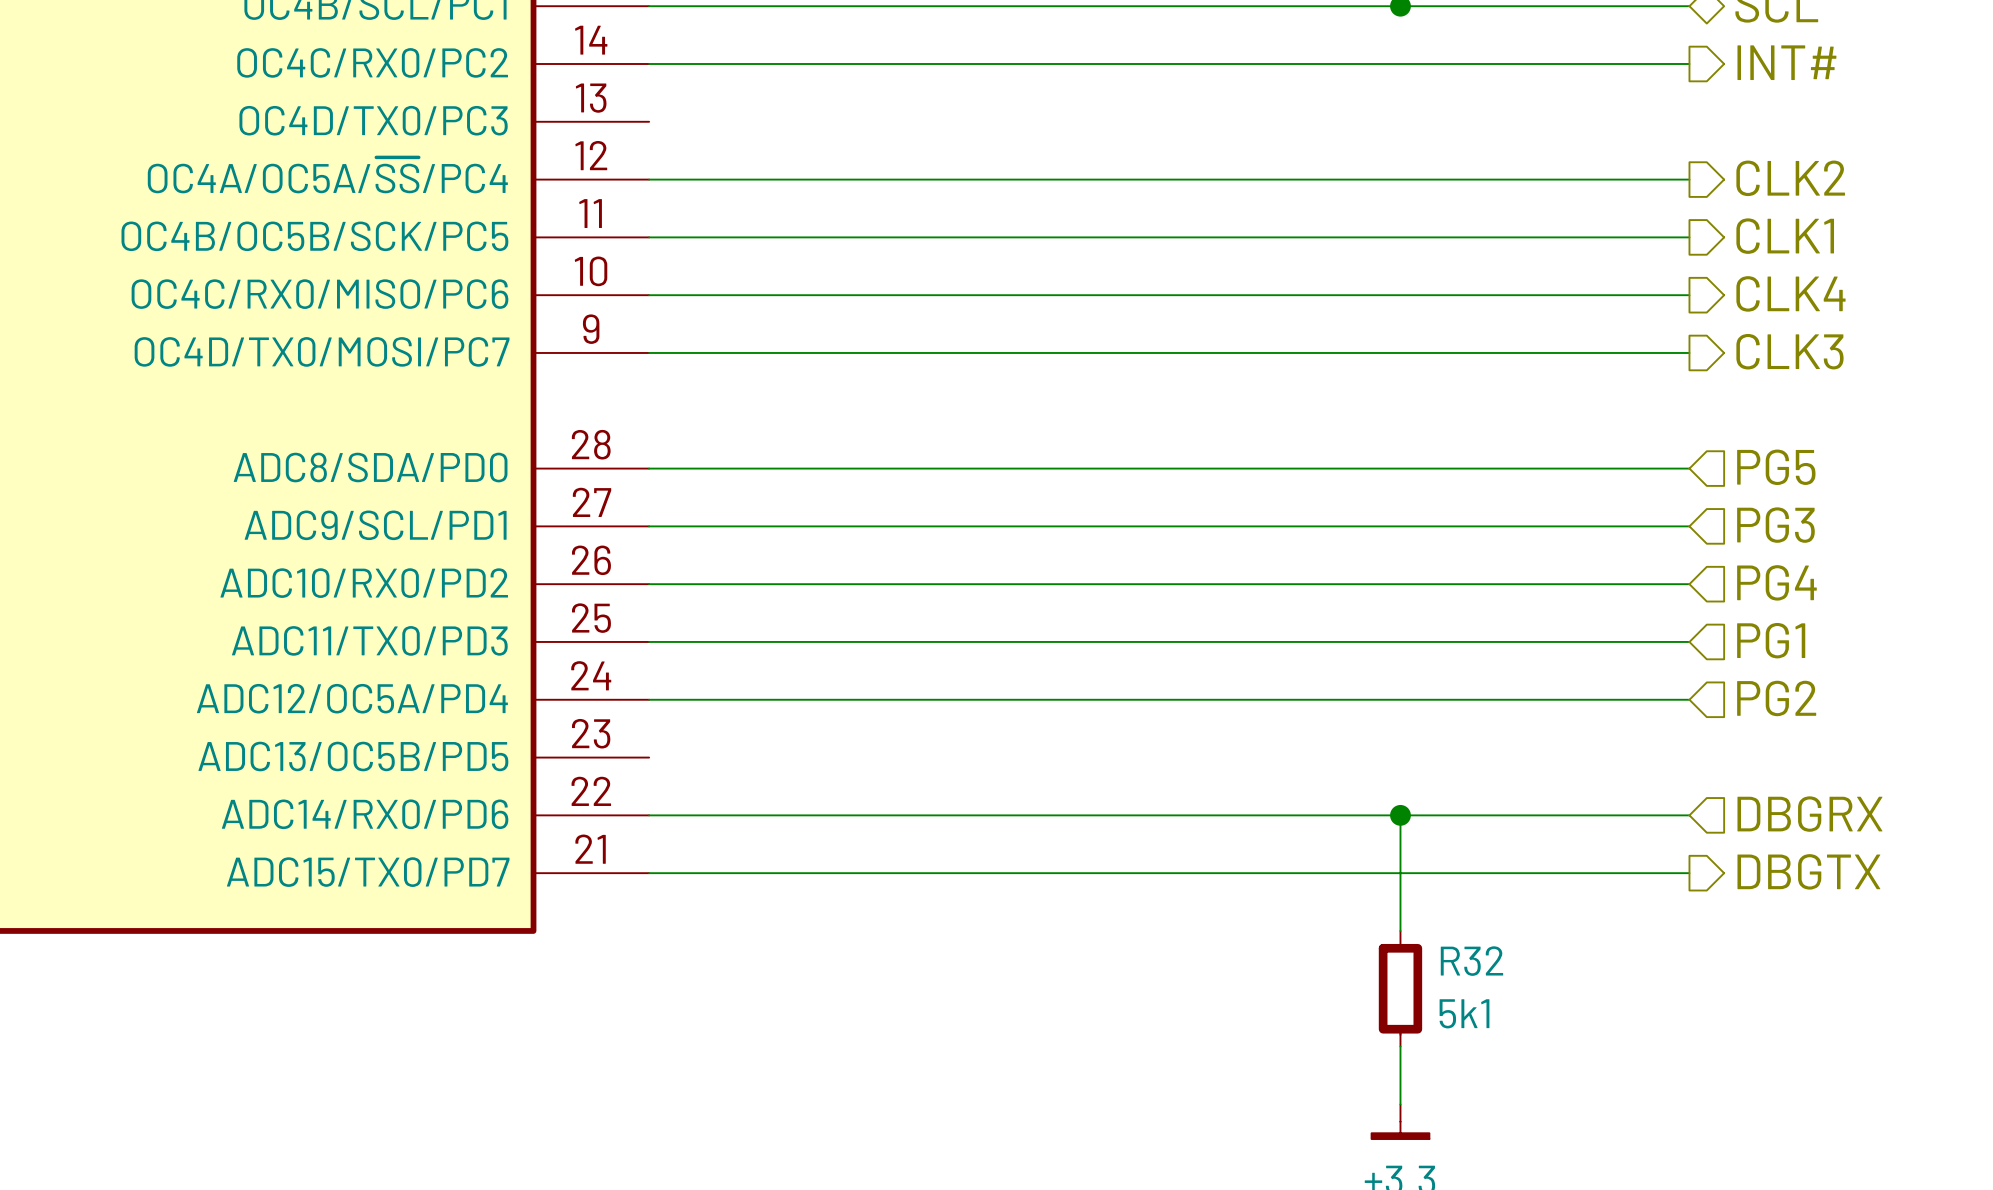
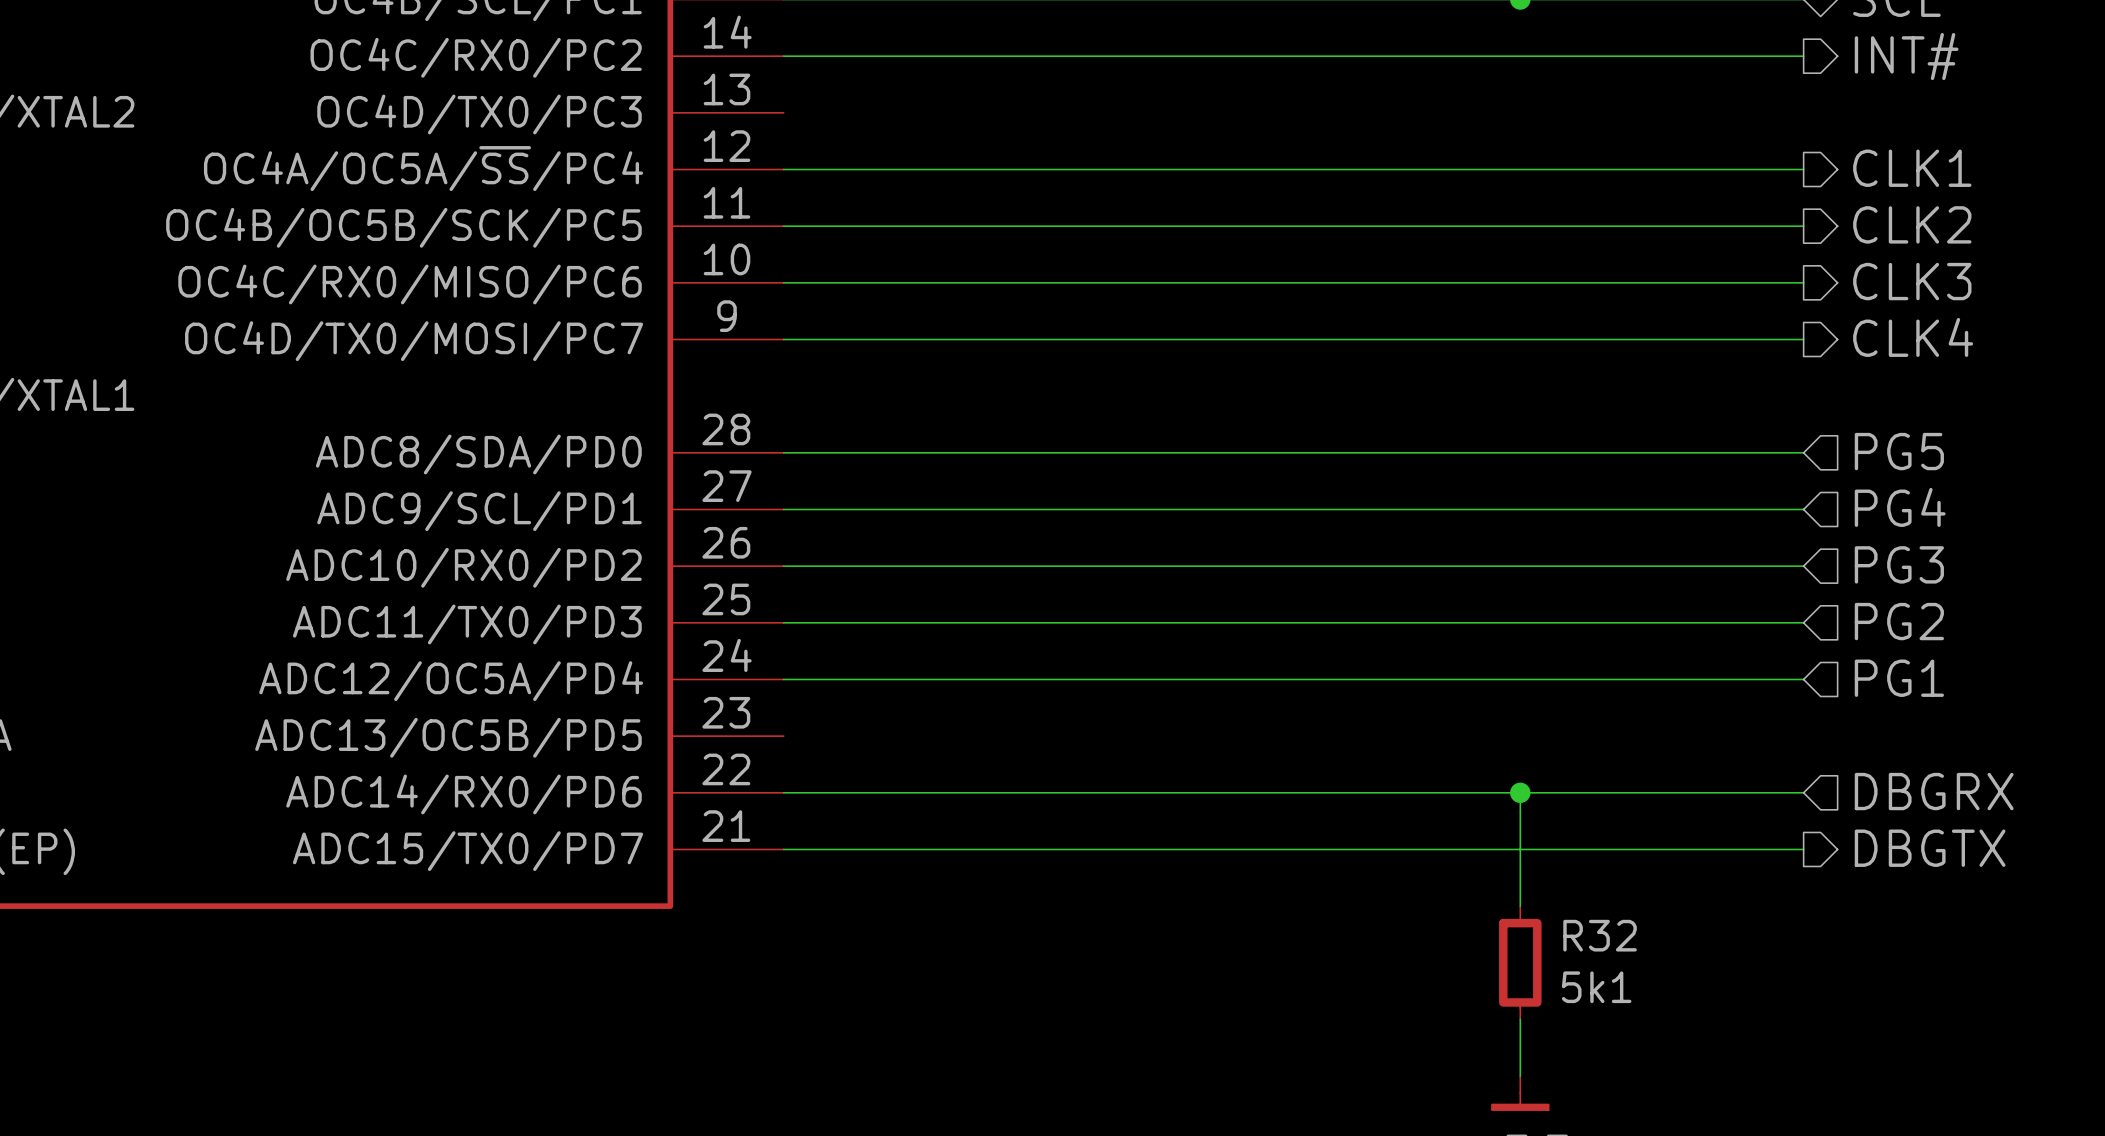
hierarchical label: CLK2 (1790, 178) -> CLK1 (1912, 168)
hierarchical label: CLK1 (1785, 236) -> CLK2 (1912, 224)
hierarchical label: CLK4 (1790, 293) -> CLK3 (1912, 281)
hierarchical label: CLK3 (1789, 351) -> CLK4 (1913, 337)
hierarchical label: PG3 (1775, 525) -> PG4 (1900, 507)
hierarchical label: PG4 (1776, 582) -> PG3 (1899, 564)
hierarchical label: PG1 (1771, 640) -> PG2 (1899, 621)
hierarchical label: PG2 (1776, 698) -> PG1 (1899, 678)

